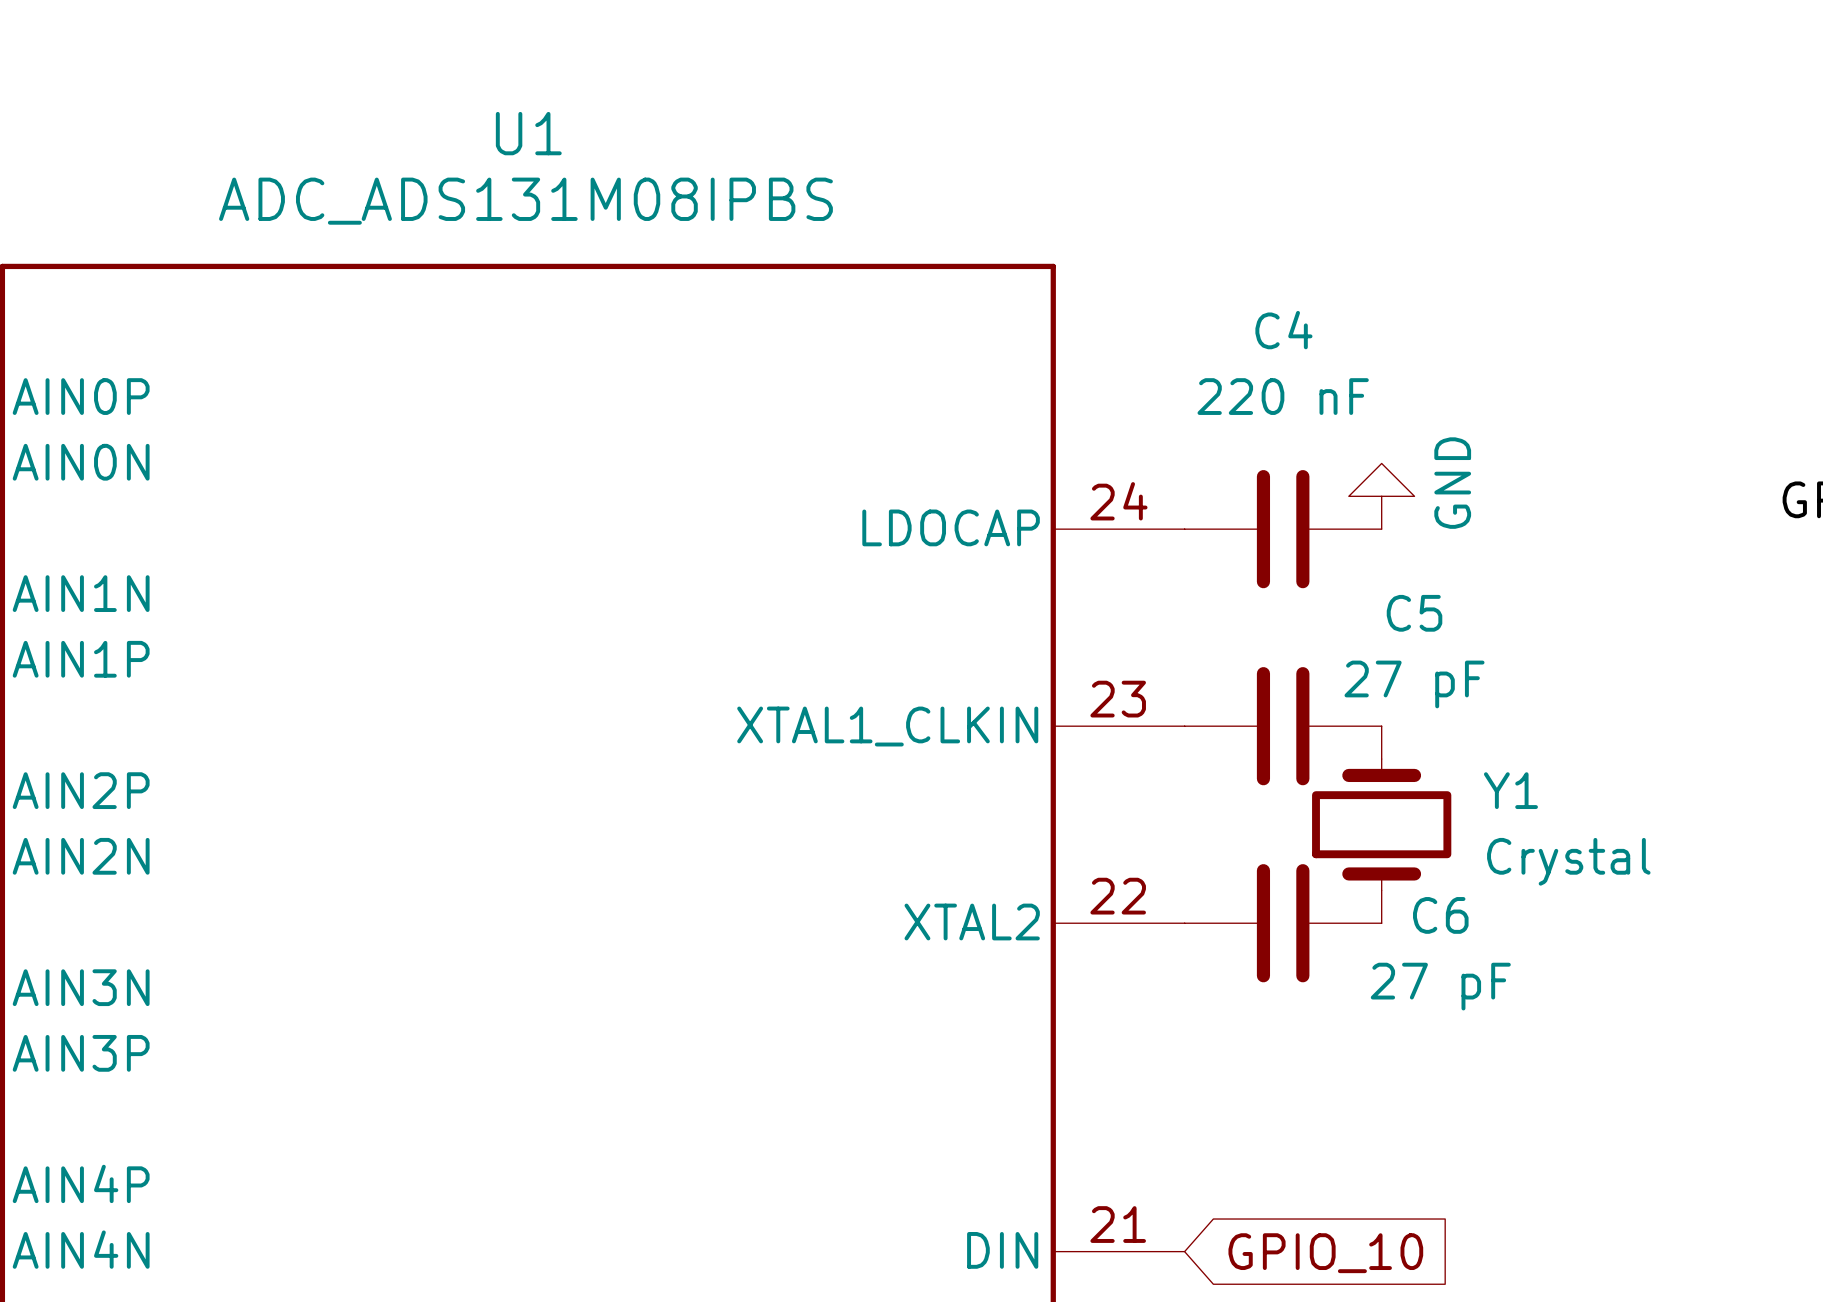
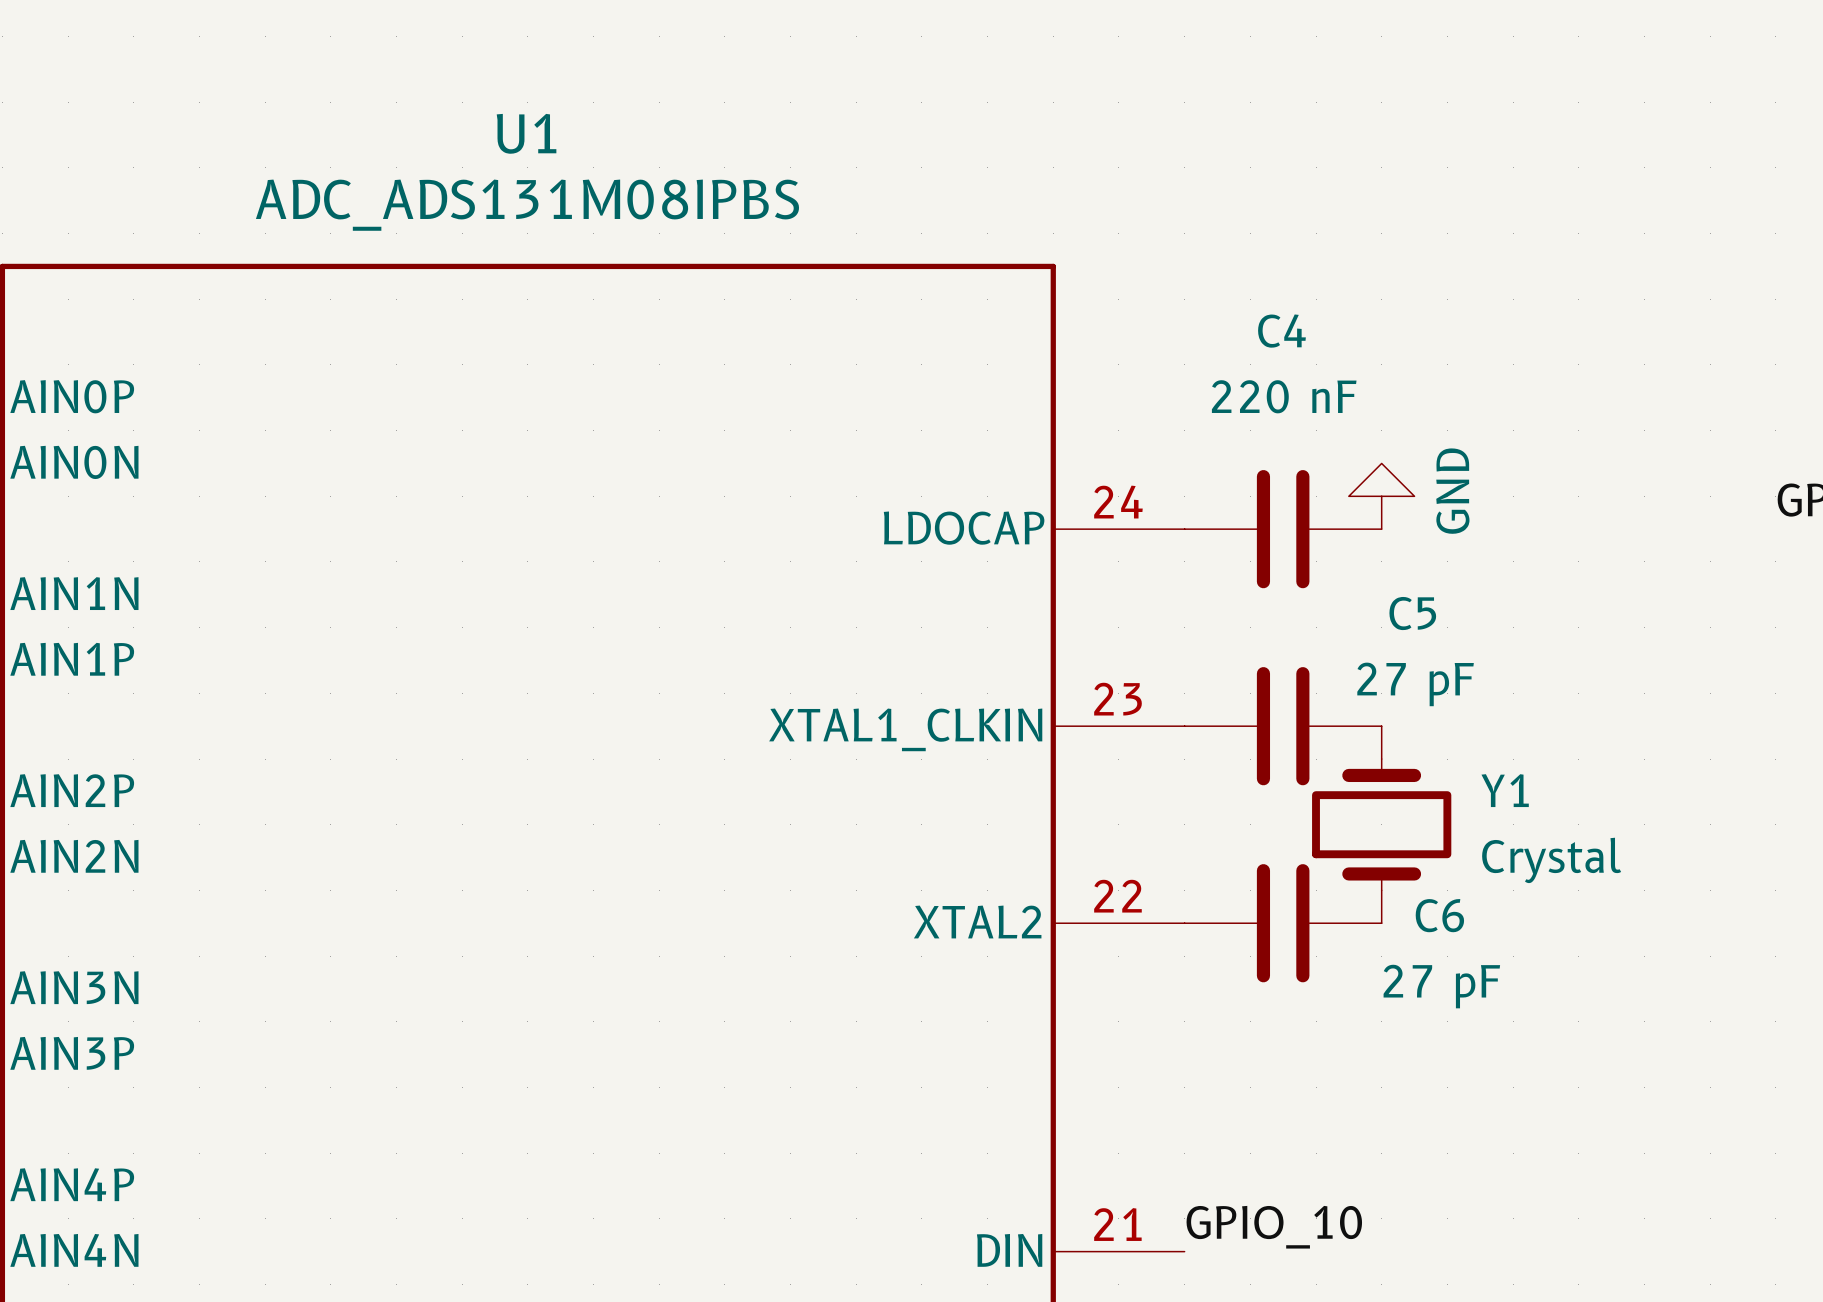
label: none -> GPIO_10 (1274, 1227)
global label: GPIO_10 (1325, 1253) -> none

